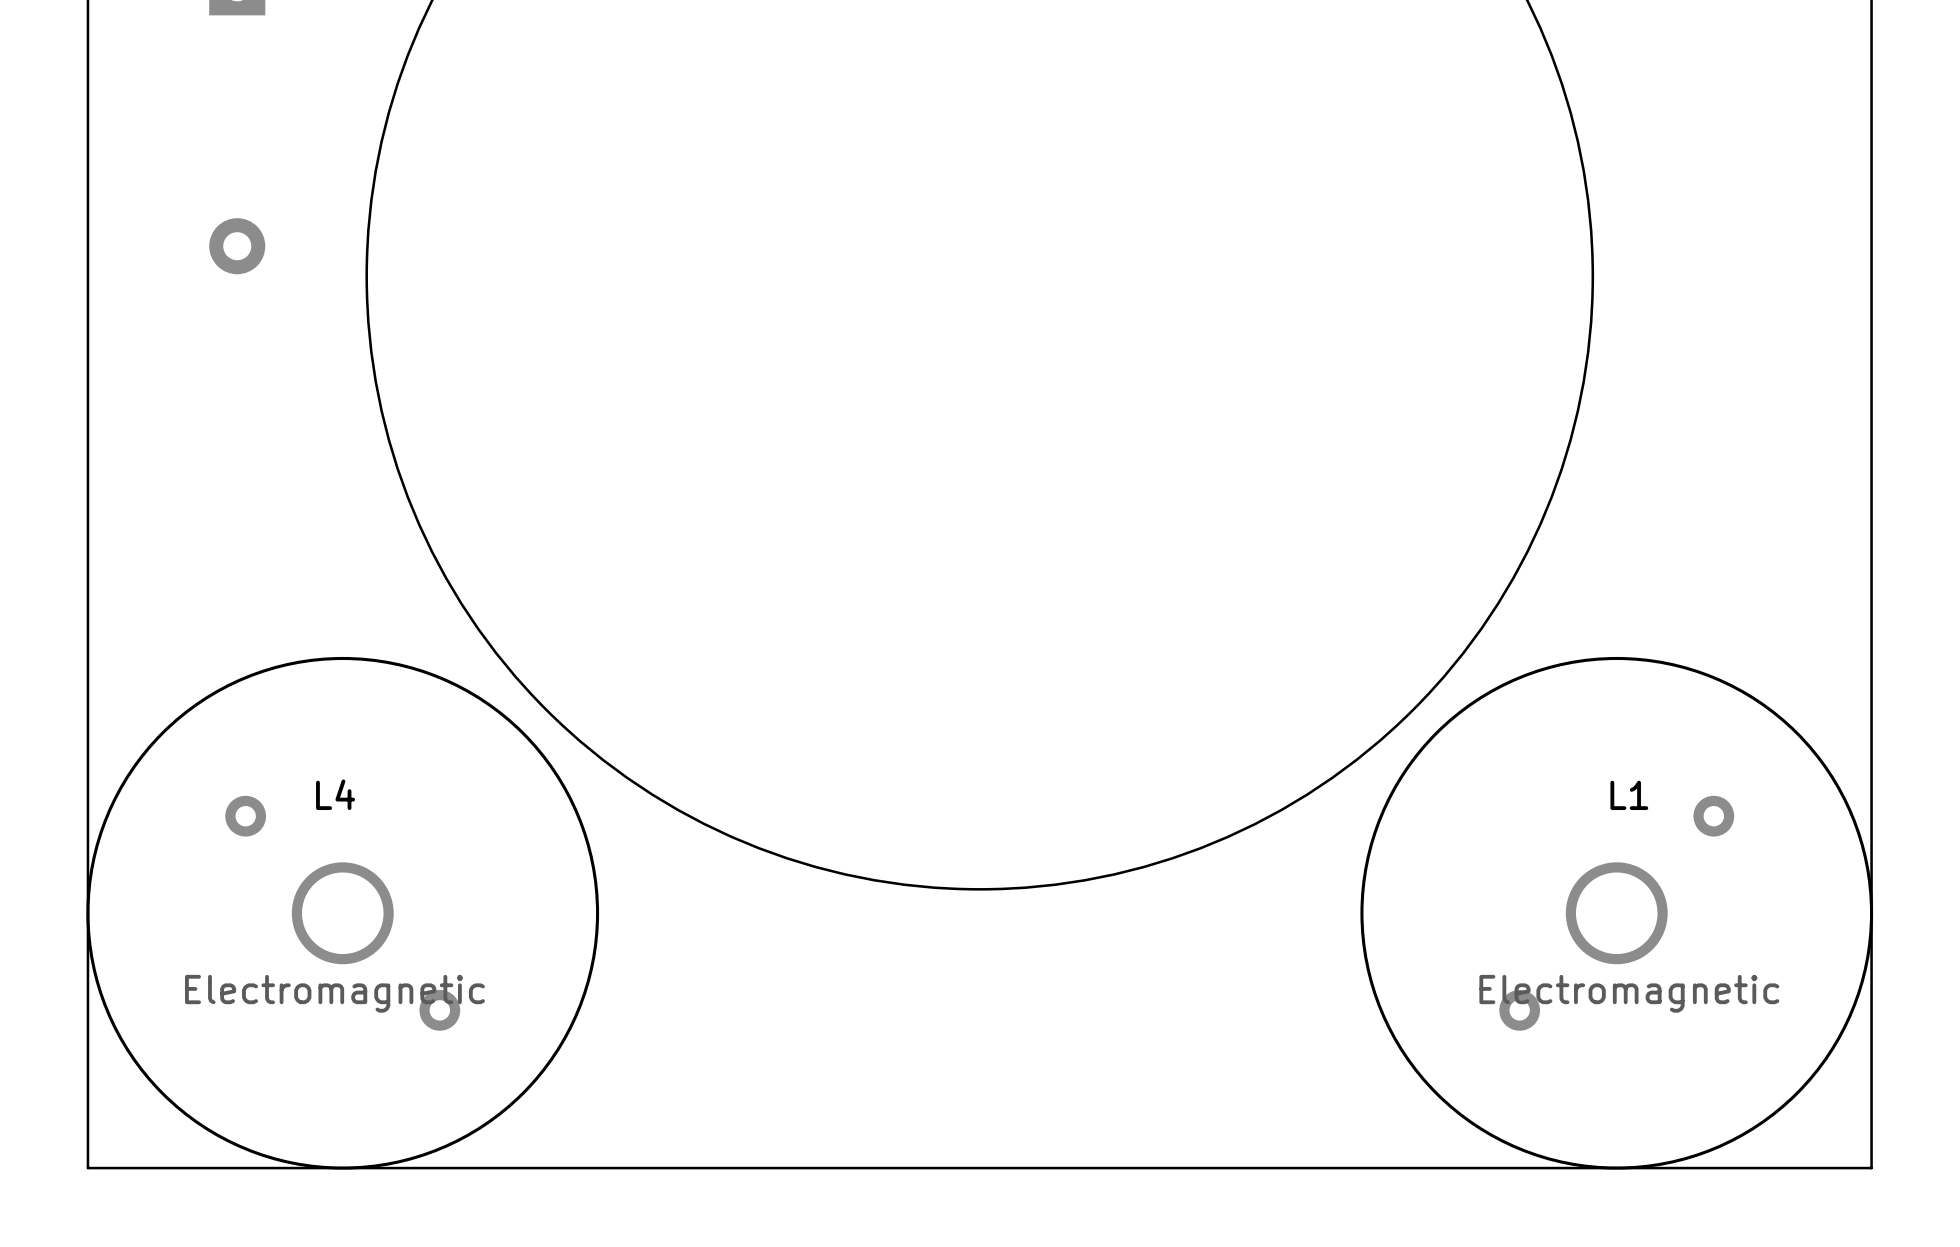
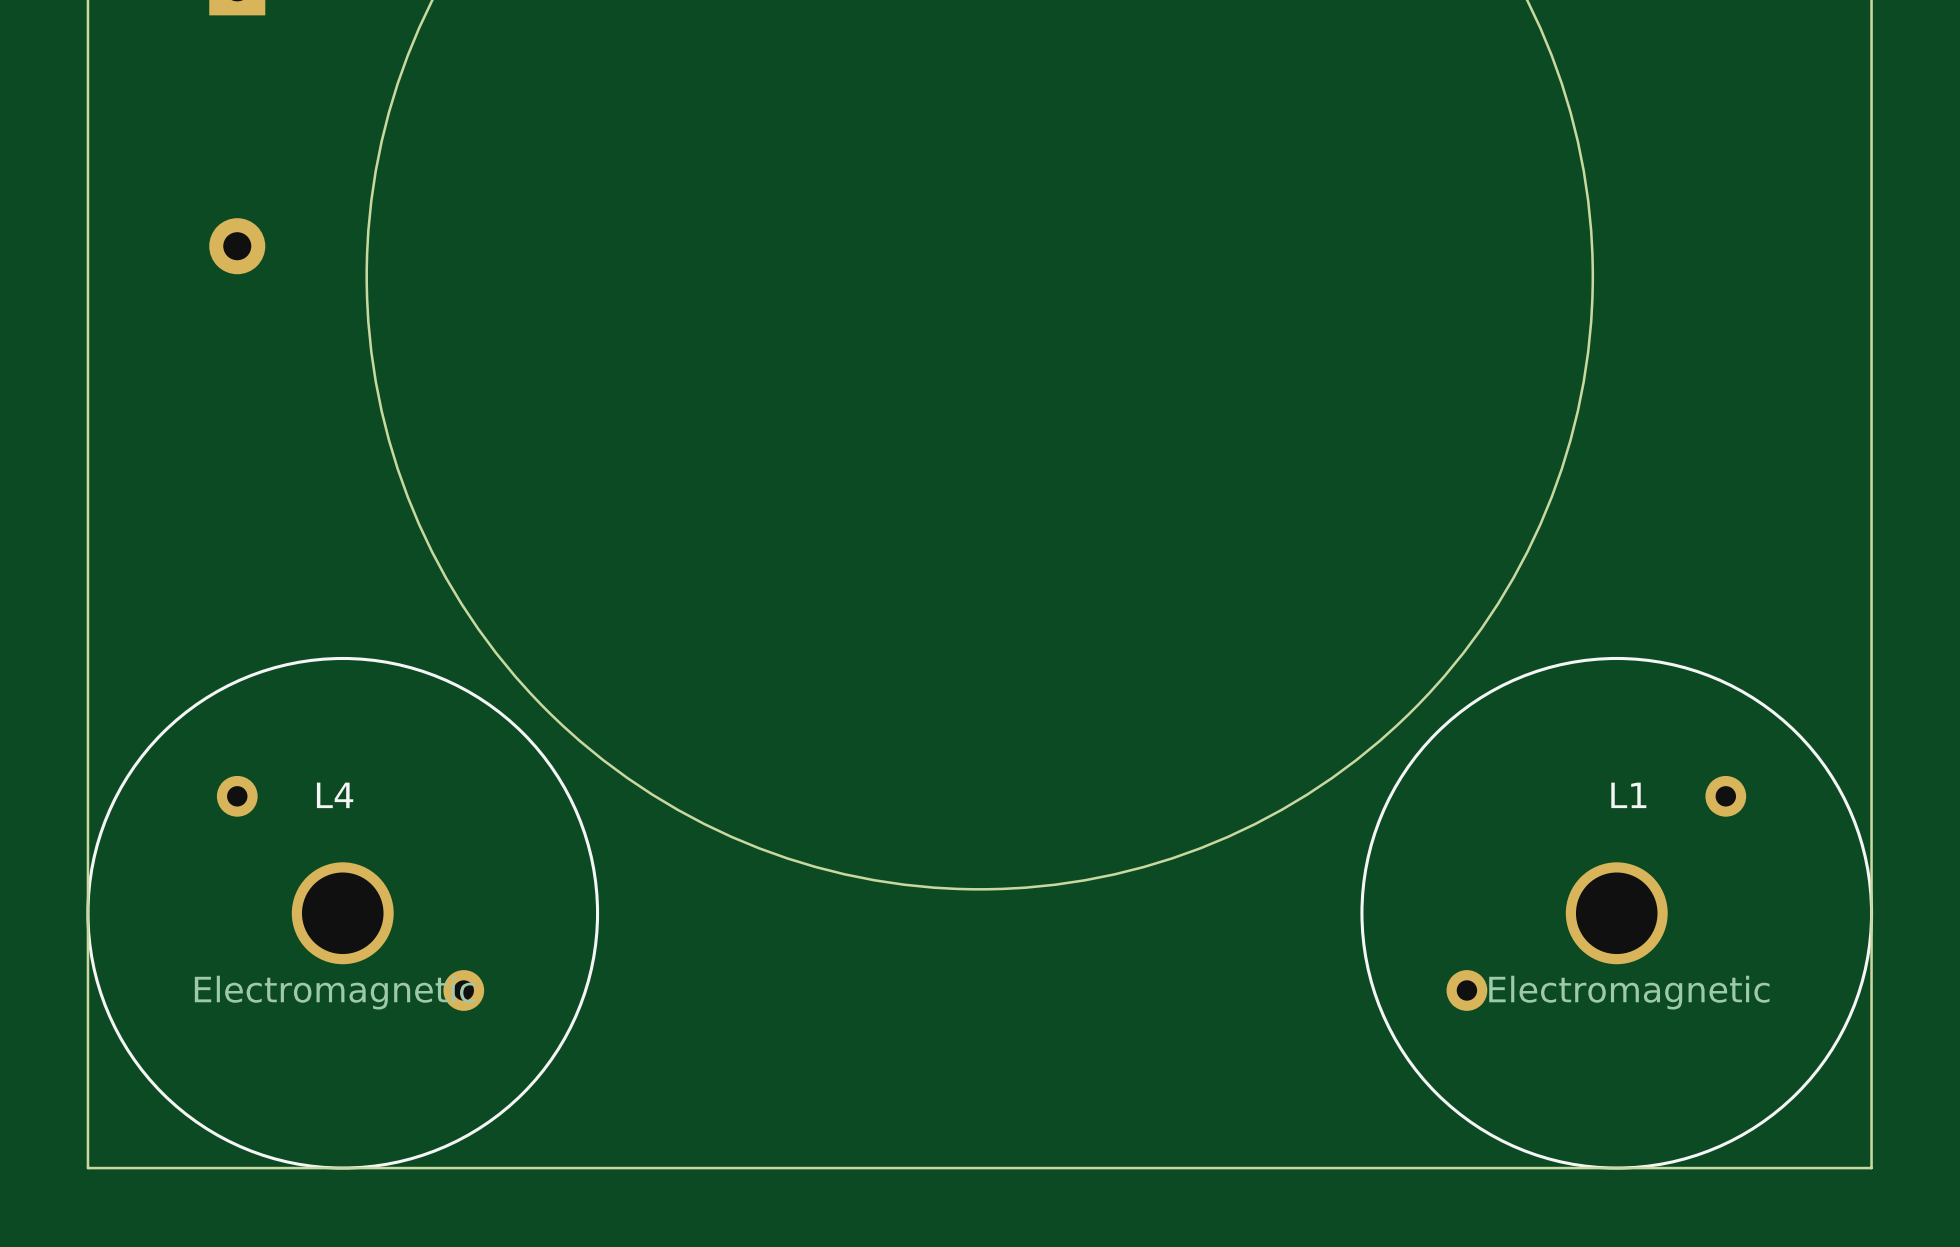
L4 footprint: [86, 656, 600, 1170] -> [86, 656, 600, 1170]
L1 footprint: [1360, 656, 1874, 1170] -> [1360, 656, 1874, 1170]

